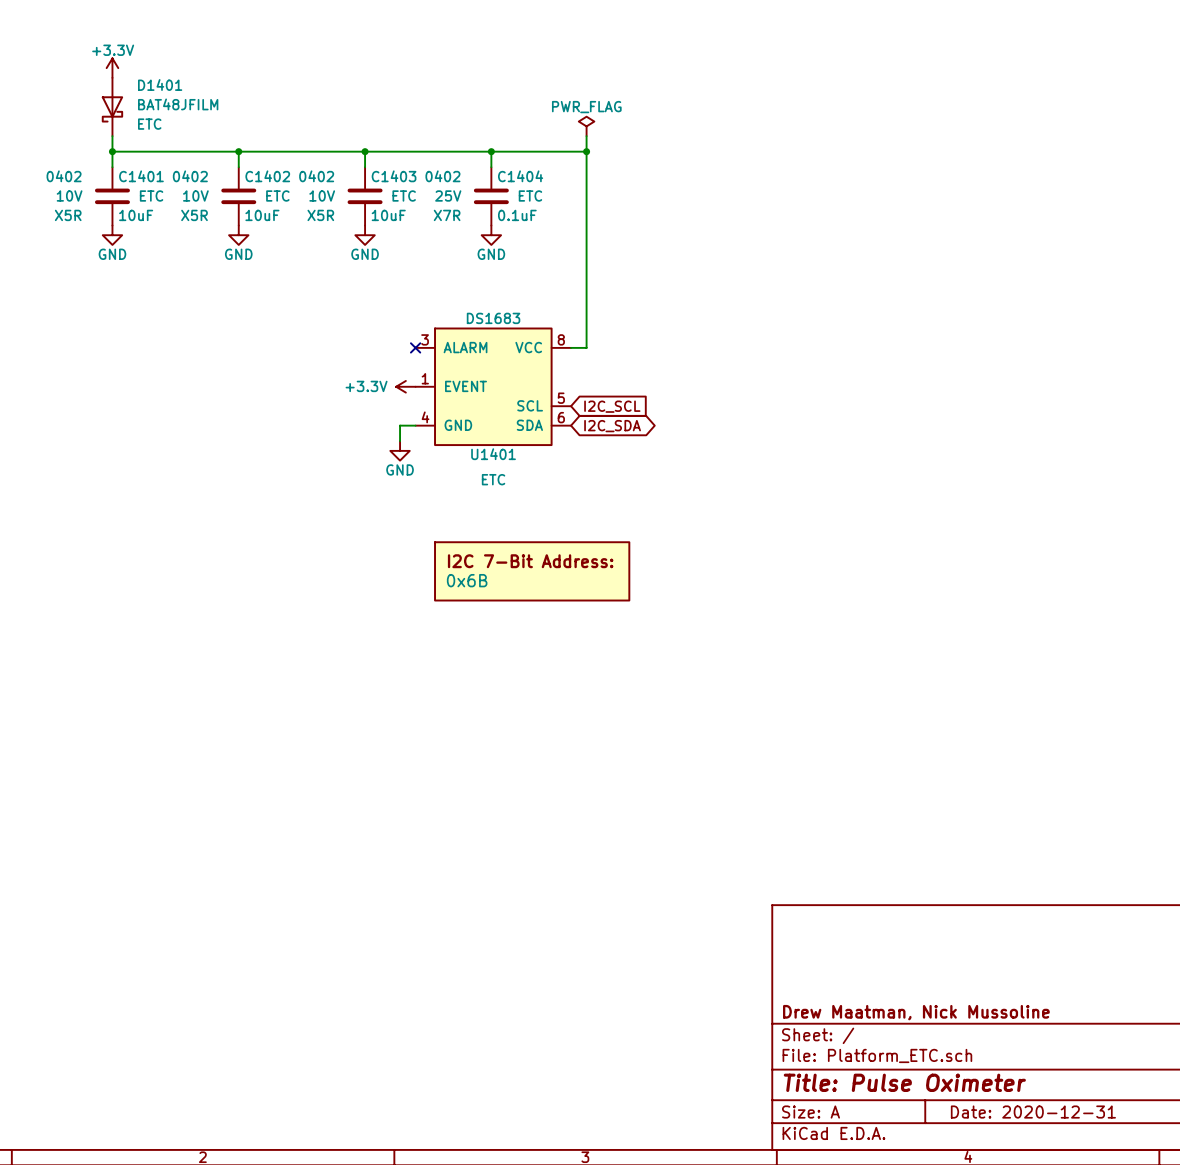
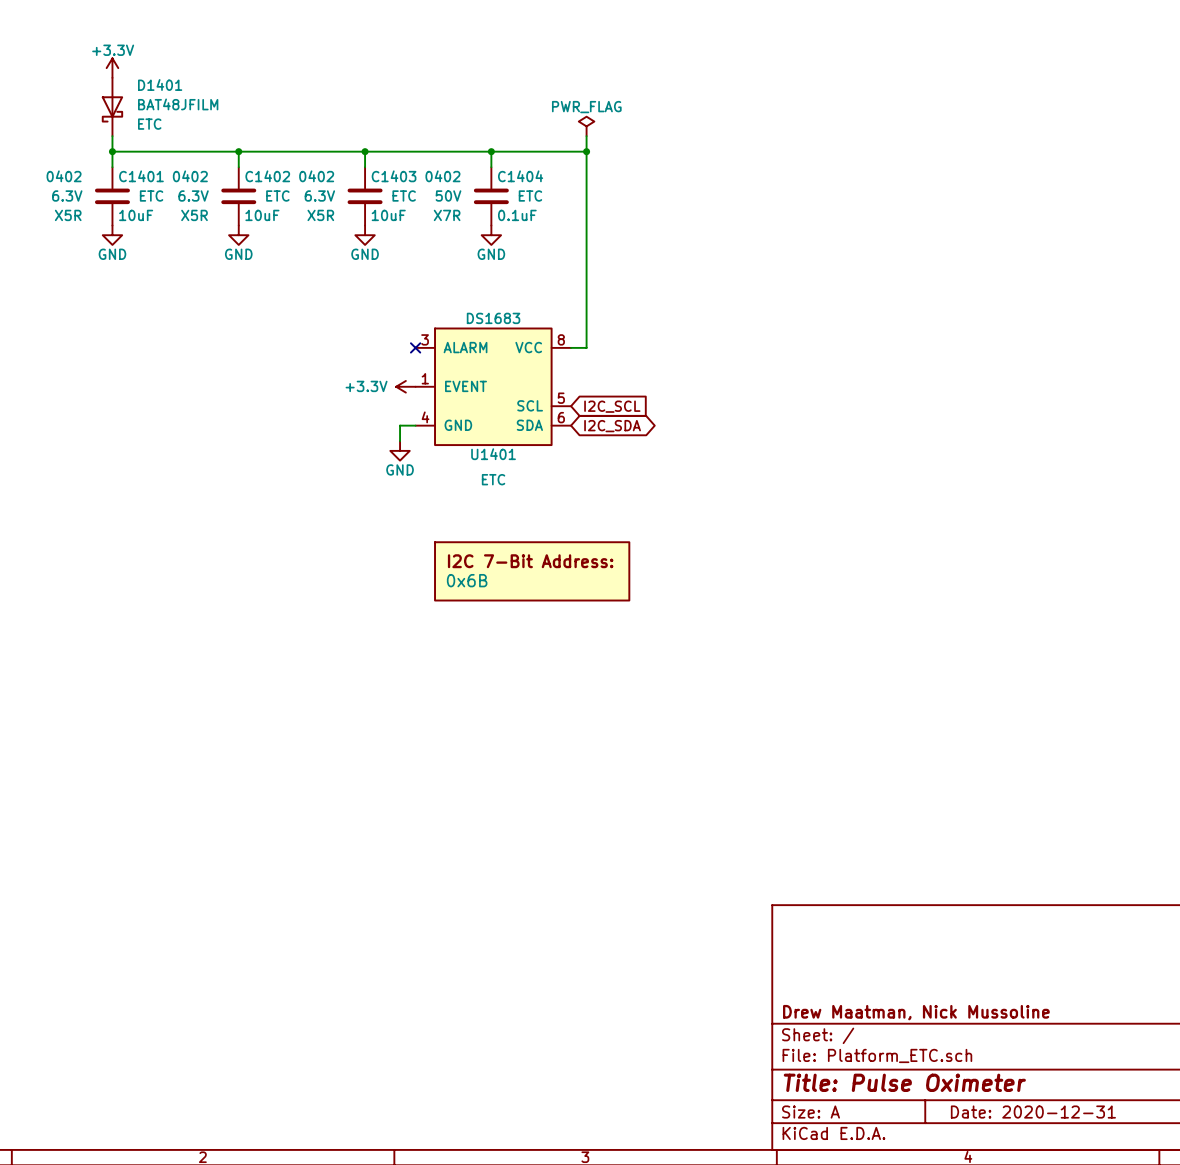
C1401 text: 10V (69, 195) -> 6.3V (67, 195)
C1402 text: 10V (195, 195) -> 6.3V (193, 195)
C1403 text: 10V (322, 195) -> 6.3V (319, 195)
C1404 text: 25V (448, 195) -> 50V (448, 195)

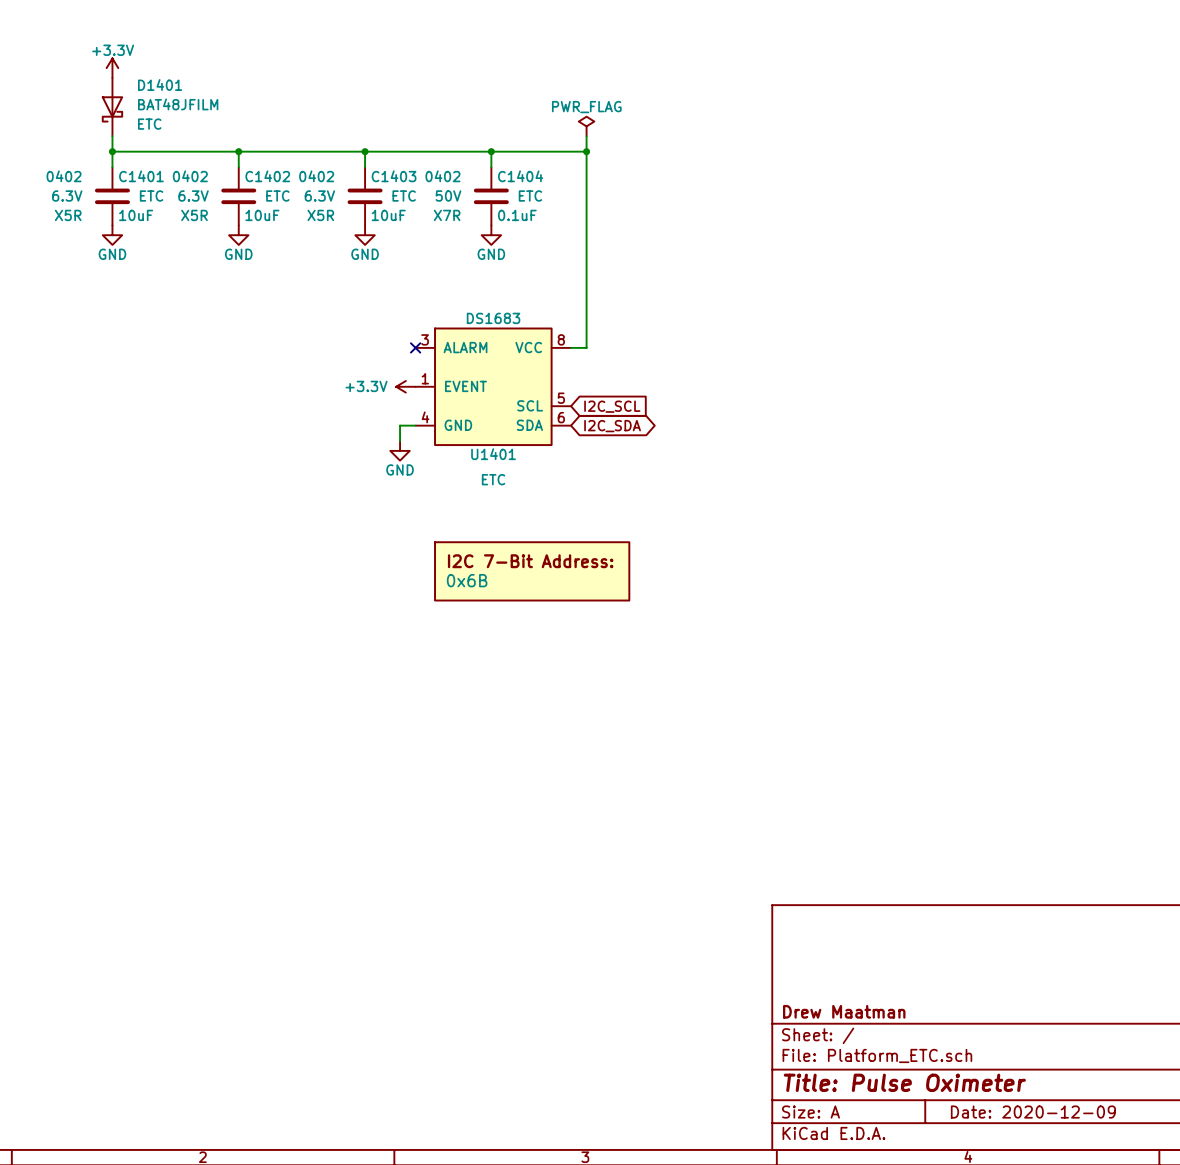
title block: Drew Maatman, Nick Mussoline (916, 1012) -> Drew Maatman (844, 1011)
title block: Date: 2020-12-31 (1033, 1112) -> Date: 2020-12-09 (1033, 1112)

